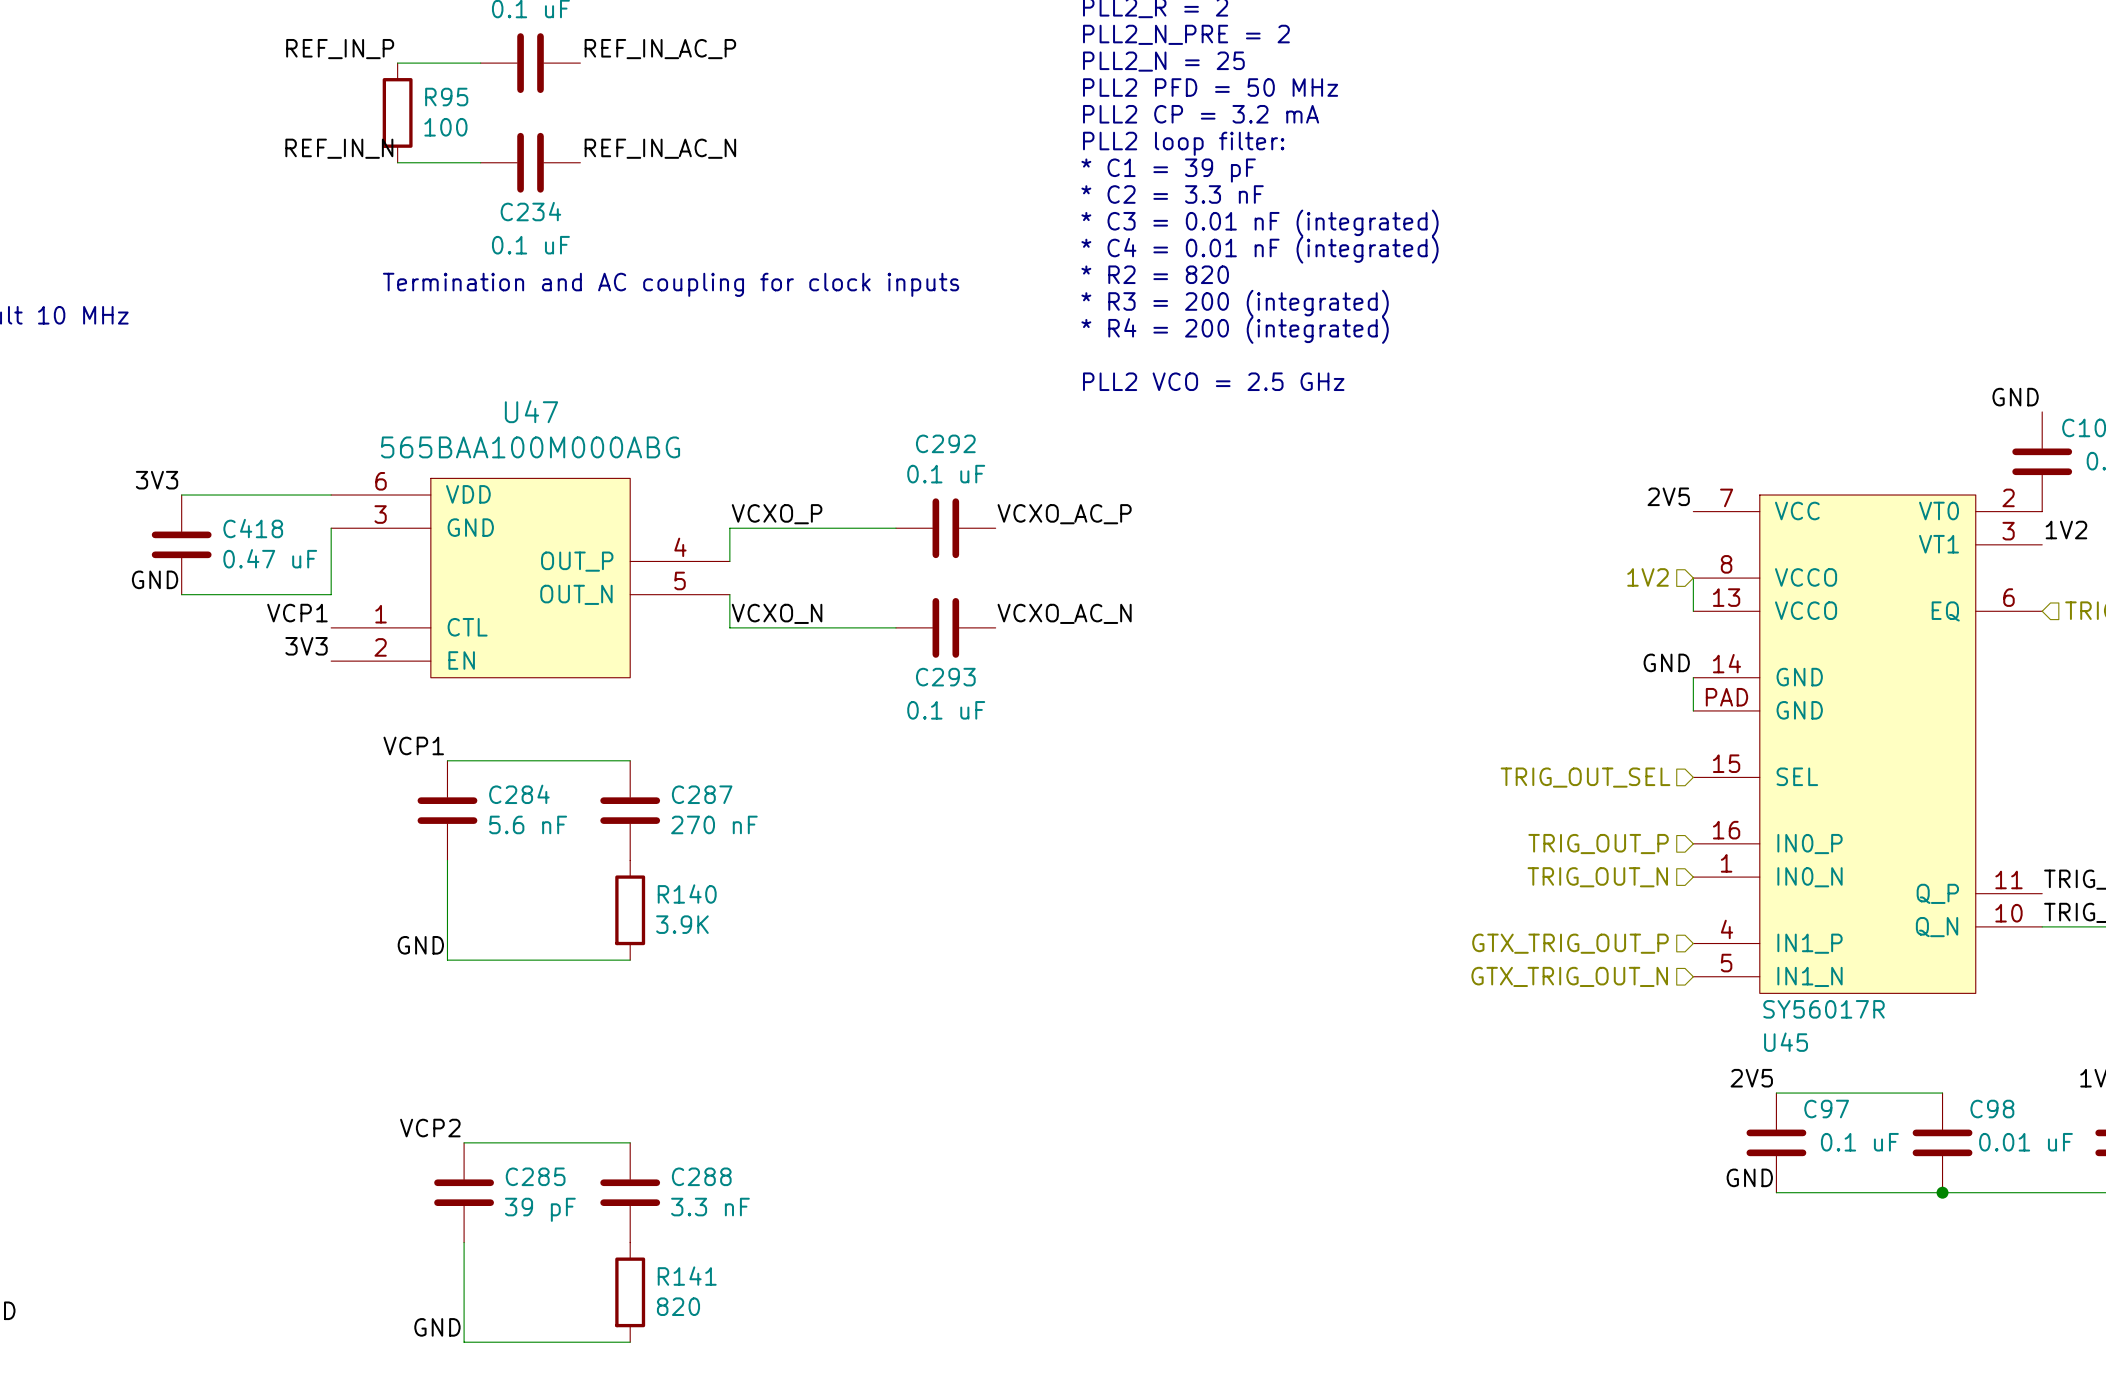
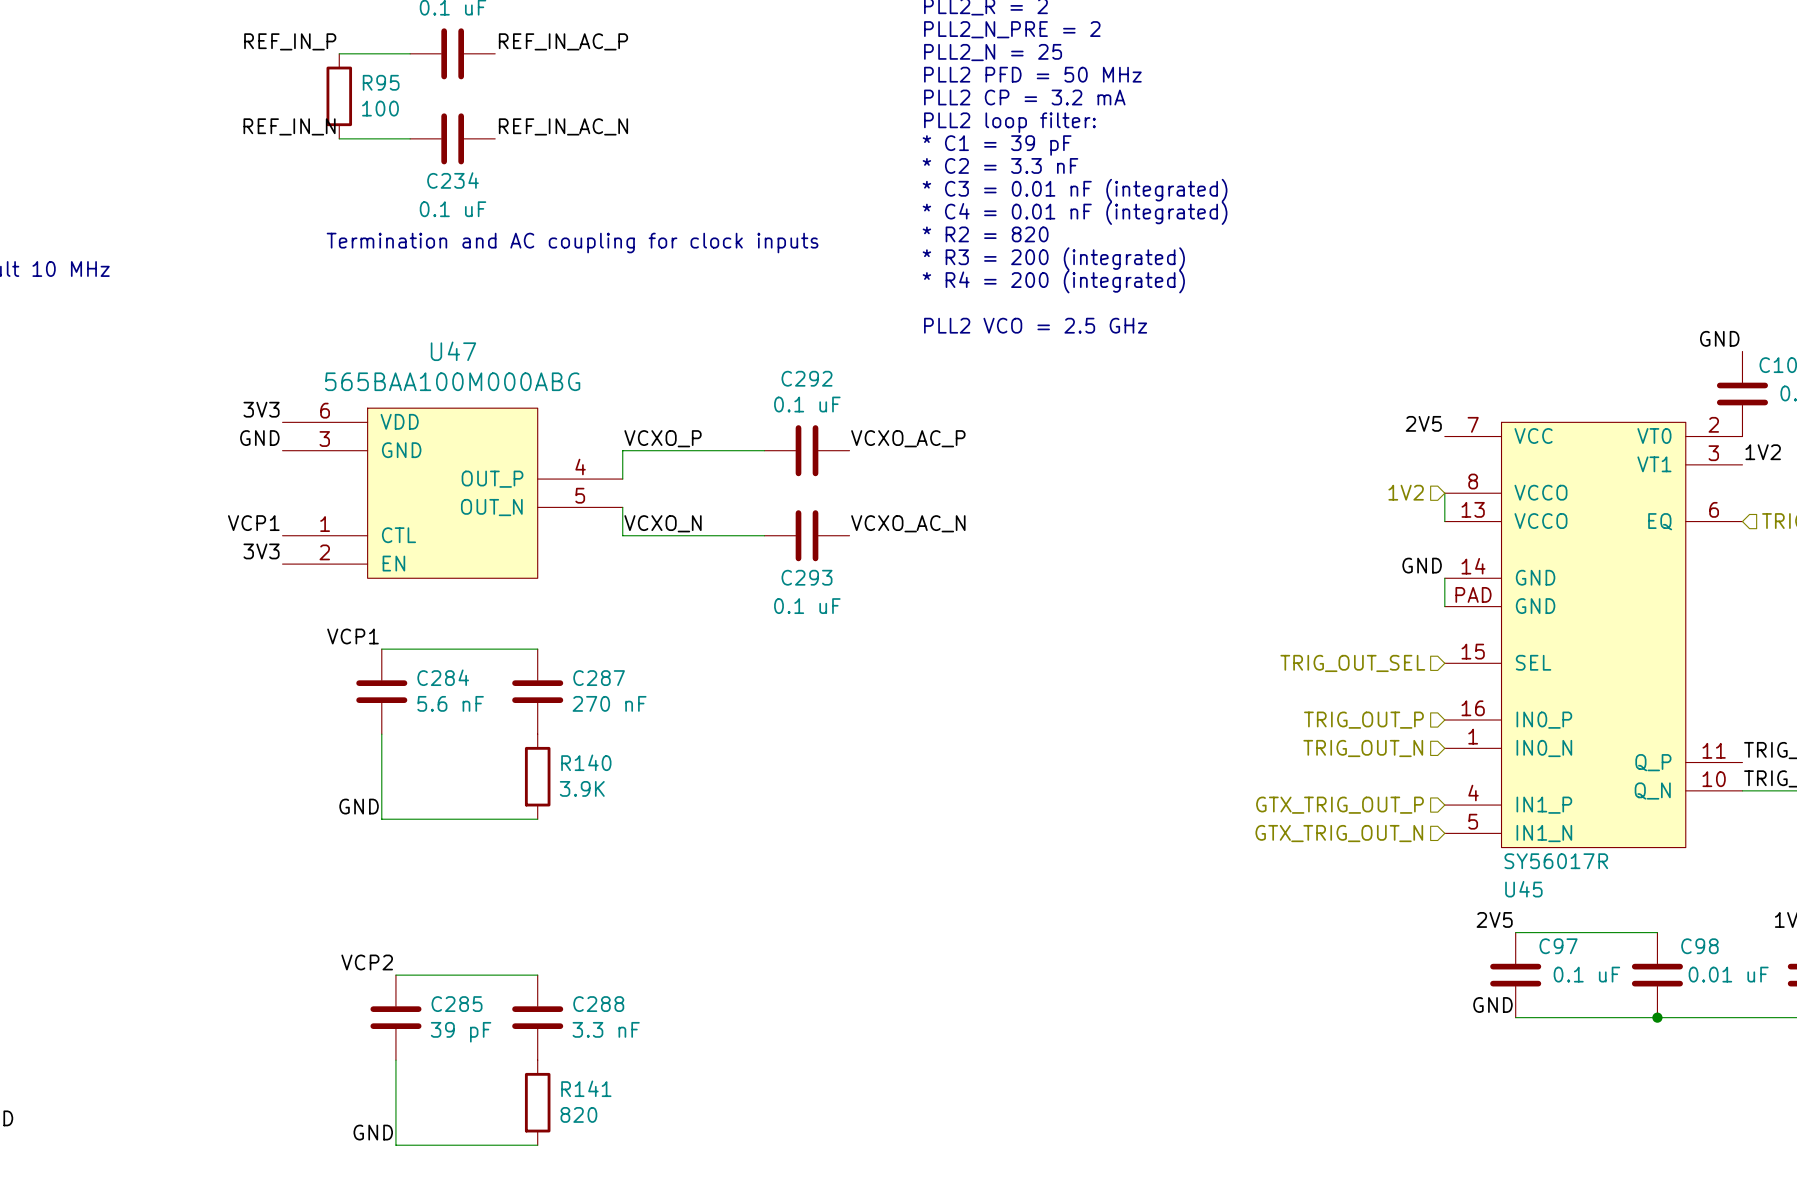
label position: 3V3 (157, 480) -> 3V3 (261, 409)
wire: (181, 495) (331, 495) -> none
wire: (331, 528) (331, 594) (181, 594) -> none
C418: 0.47 uF (181, 544) -> none
label position: GND (155, 579) -> GND (259, 438)

